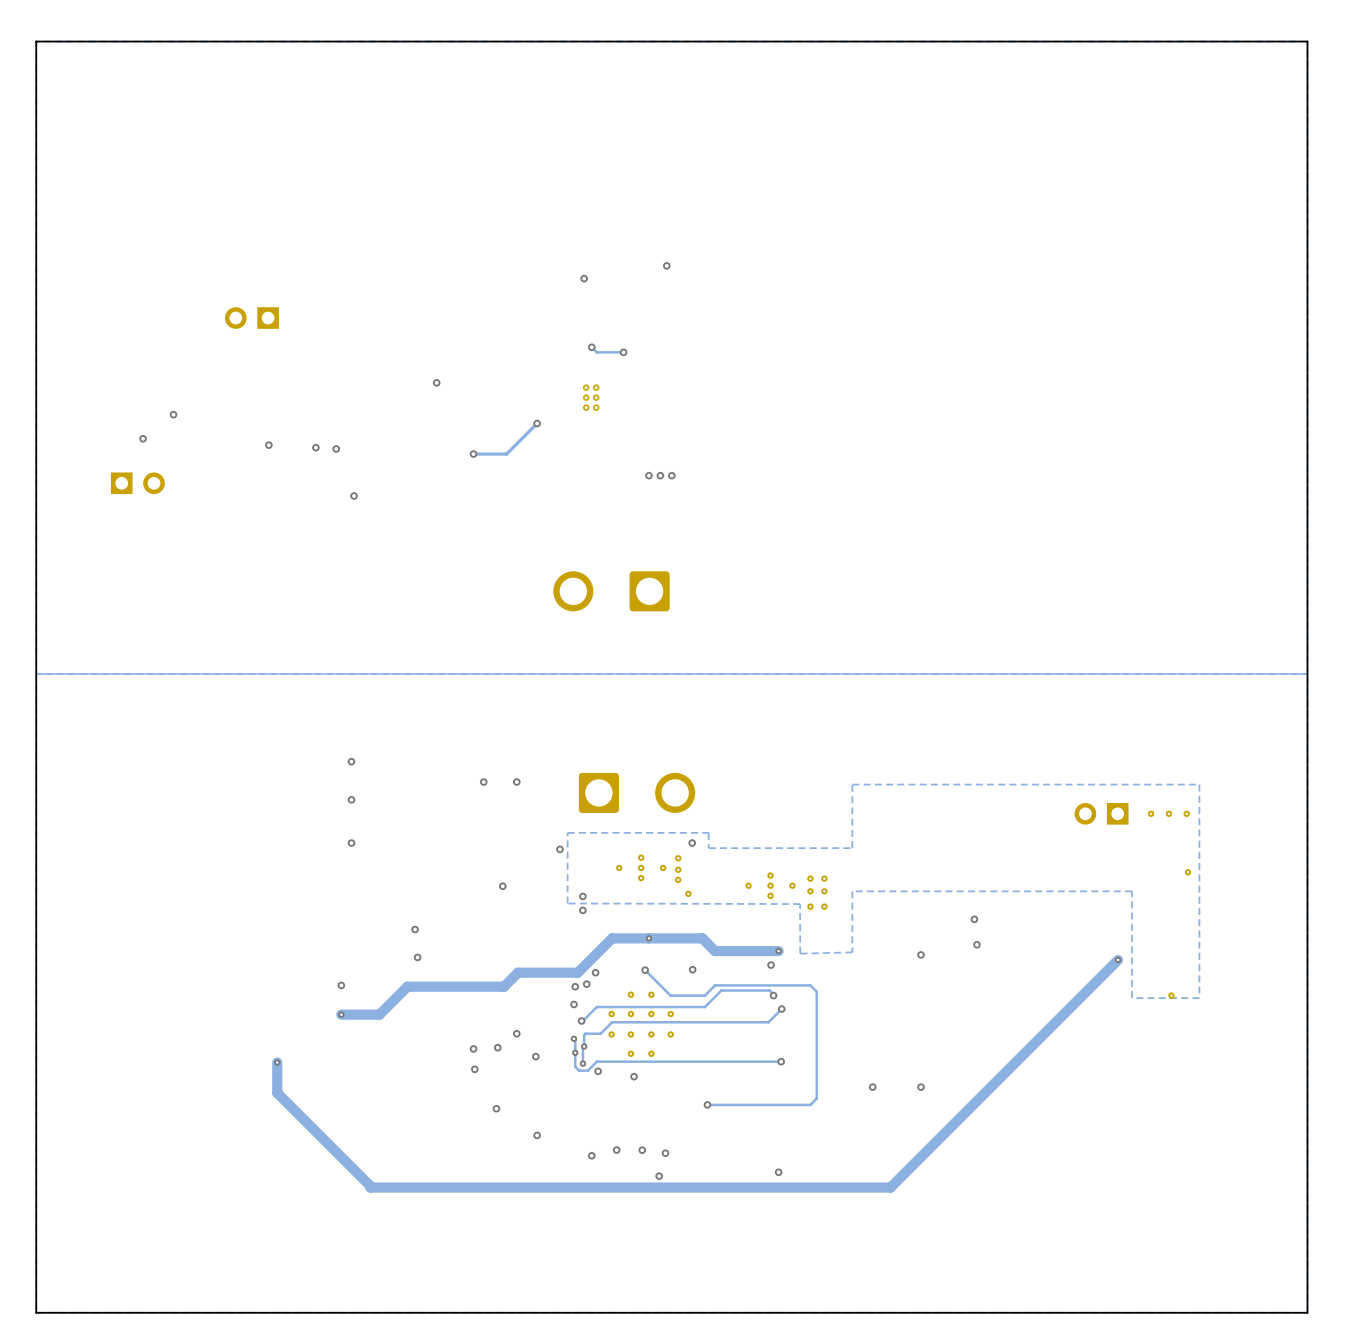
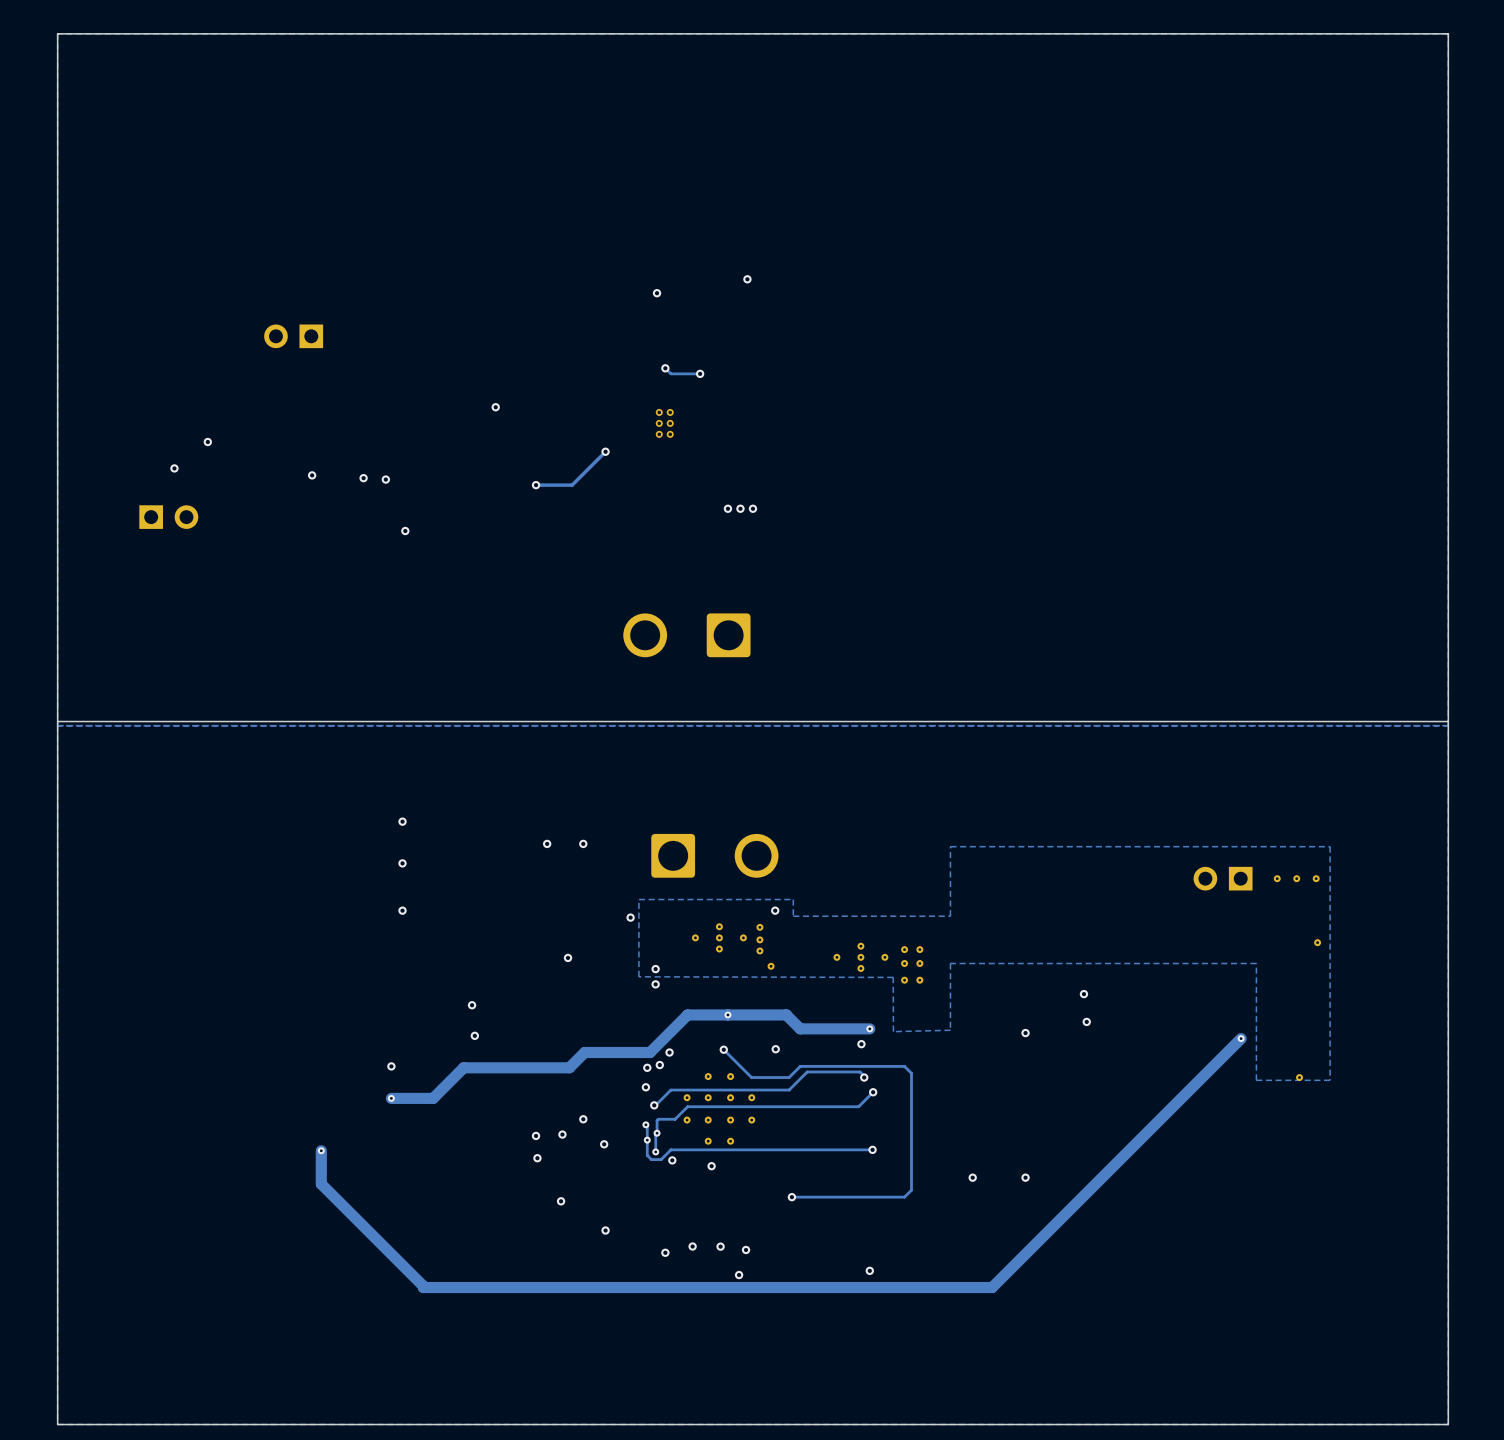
board edge: none -> (1448, 721) (57, 721)

